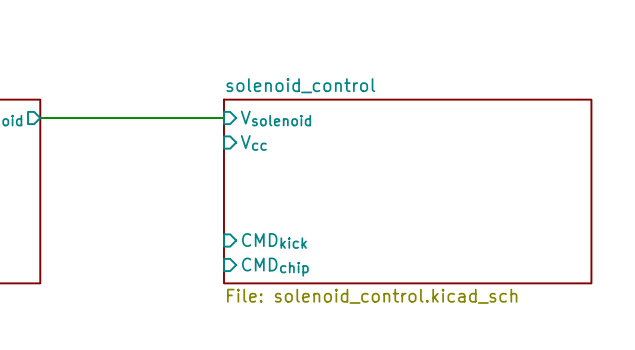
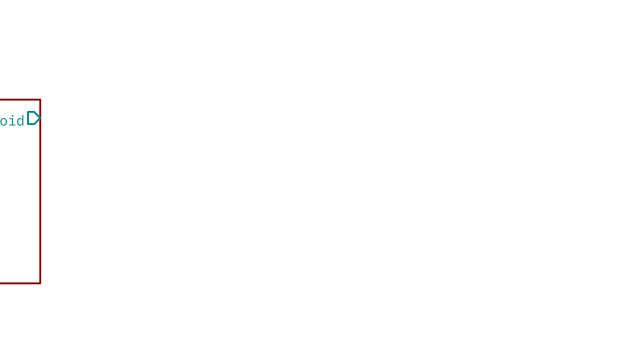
wire: (40, 118) (223, 118) -> none
sheet pin: Vsolenoid (275, 118) -> none
sheet pin: Vcc (253, 142) -> none
sheet solenoid_control: File: solenoid_control.kicad_sch (407, 191) -> none
sheet pin: CMDkick (274, 240) -> none
sheet pin: CMDchip (275, 267) -> none

